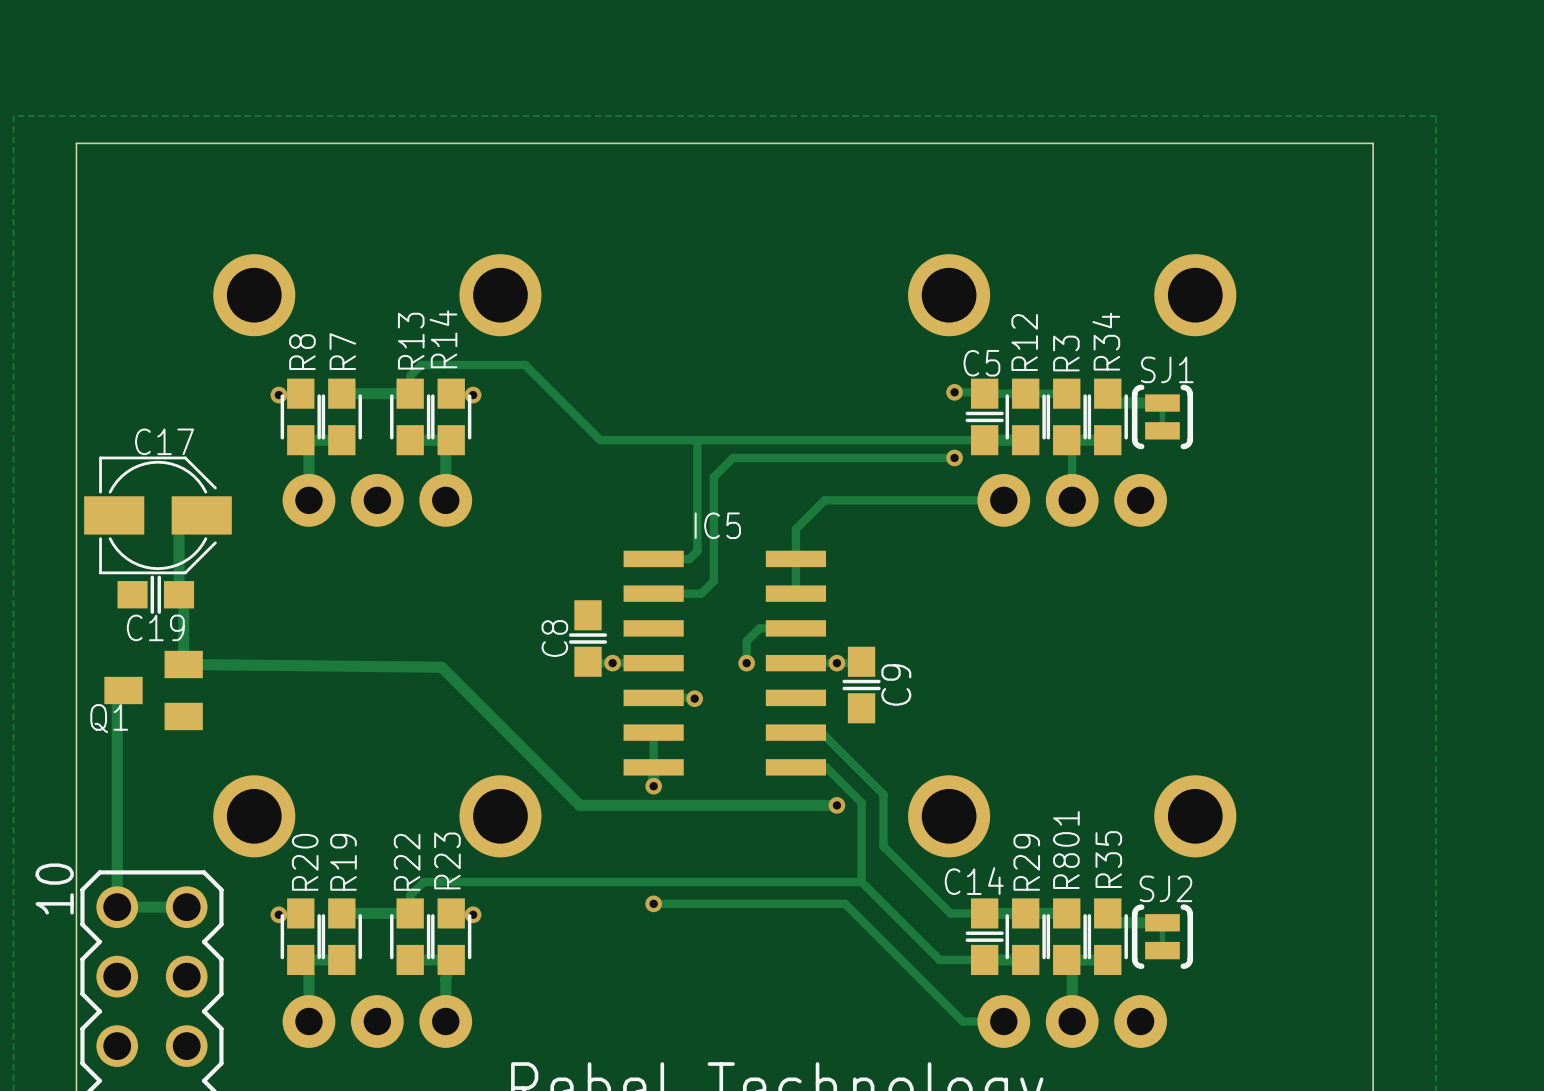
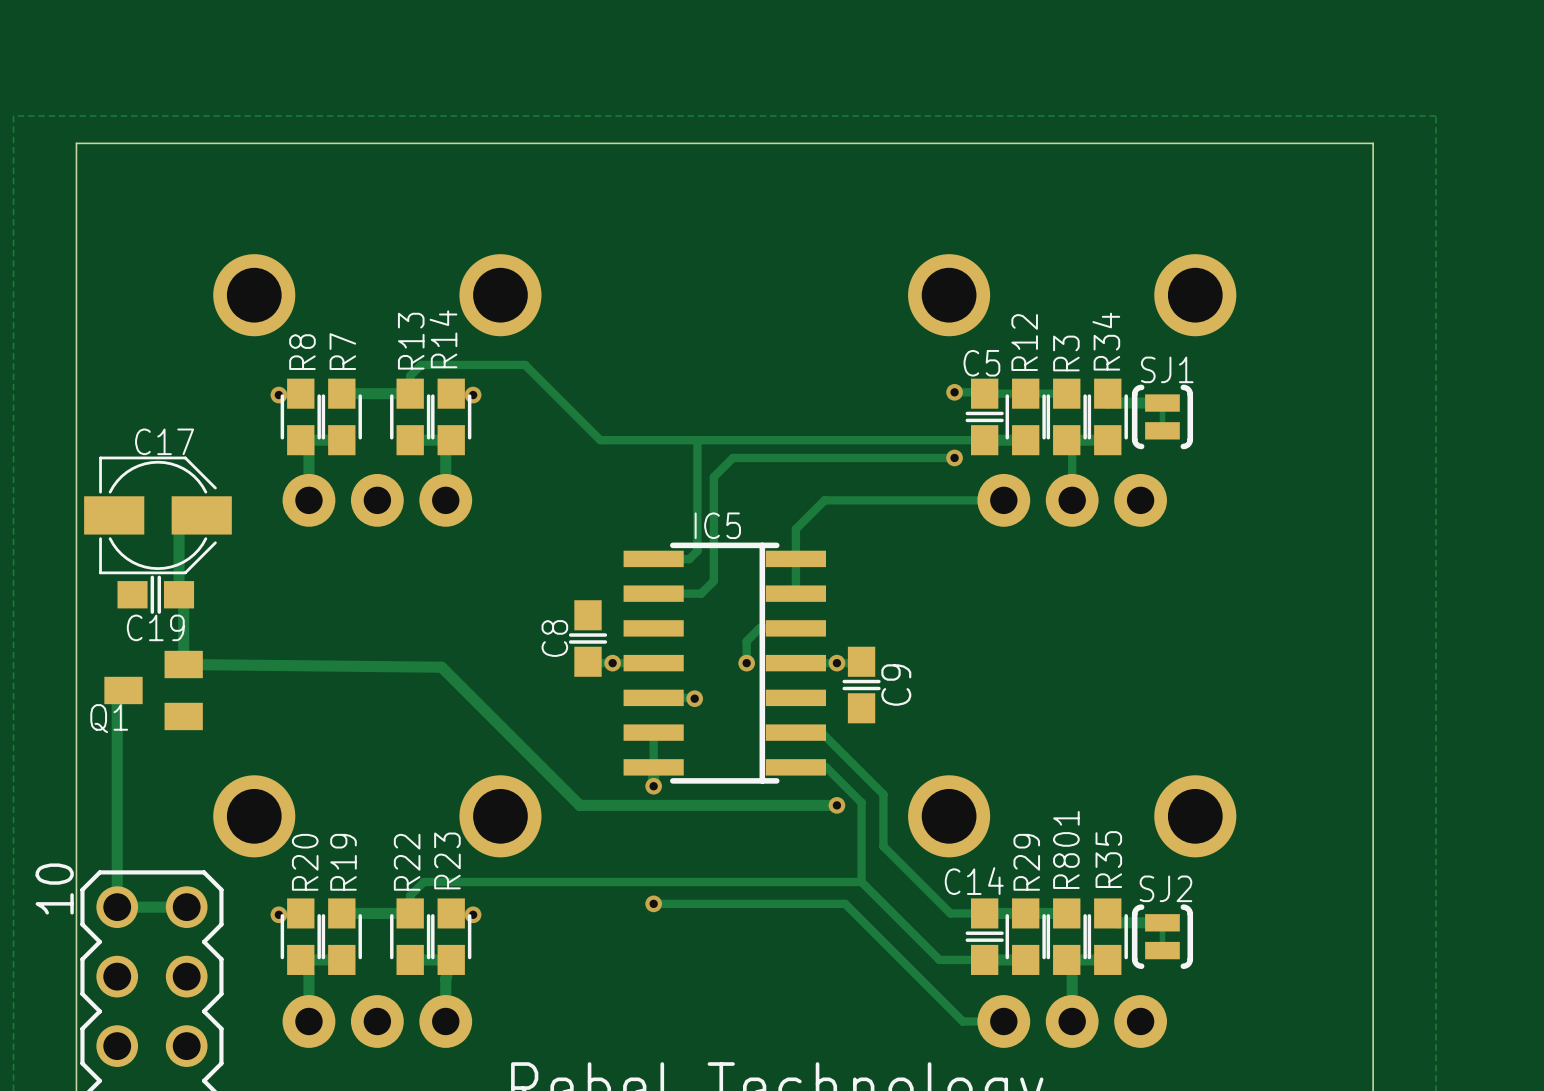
IC5 footprint: [623, 550, 827, 776] -> [623, 542, 827, 784]

